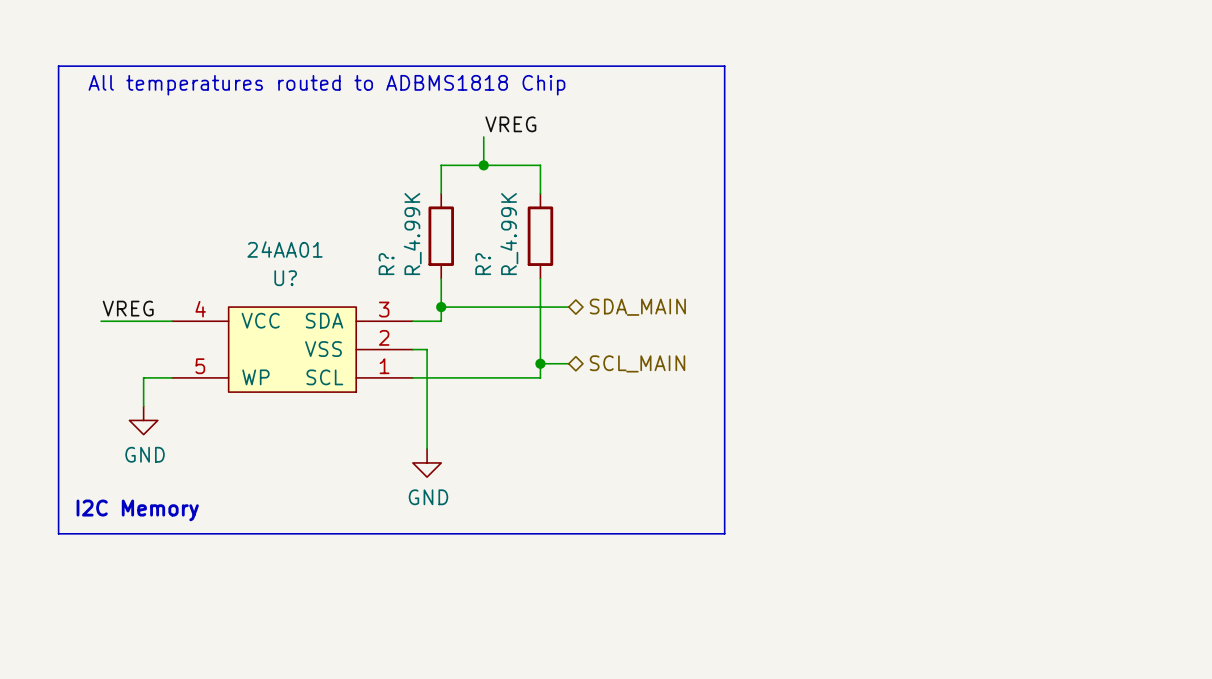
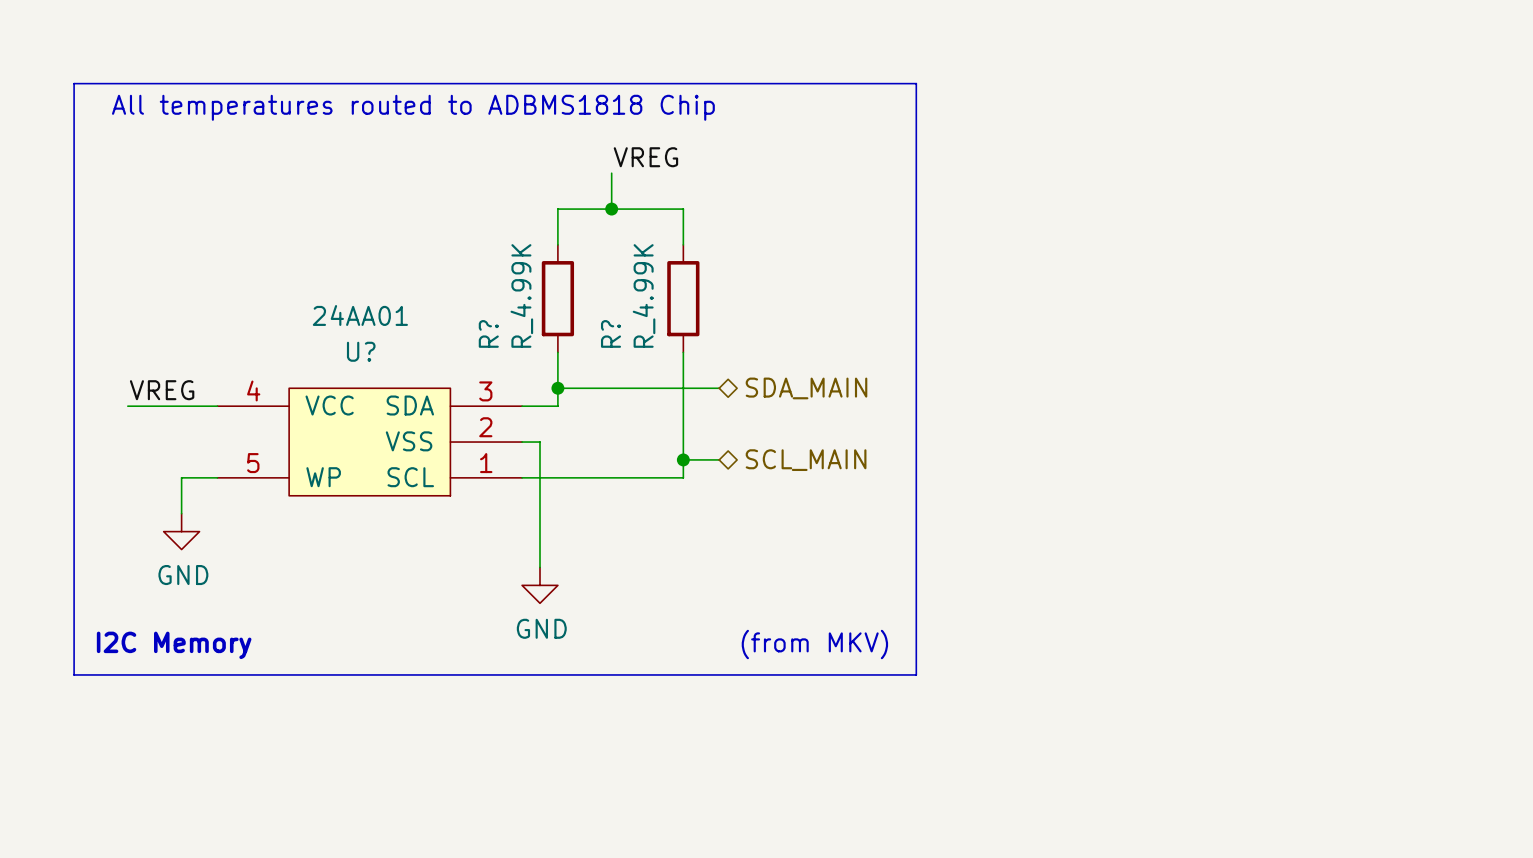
text: none -> (from MKV) (814, 644)

